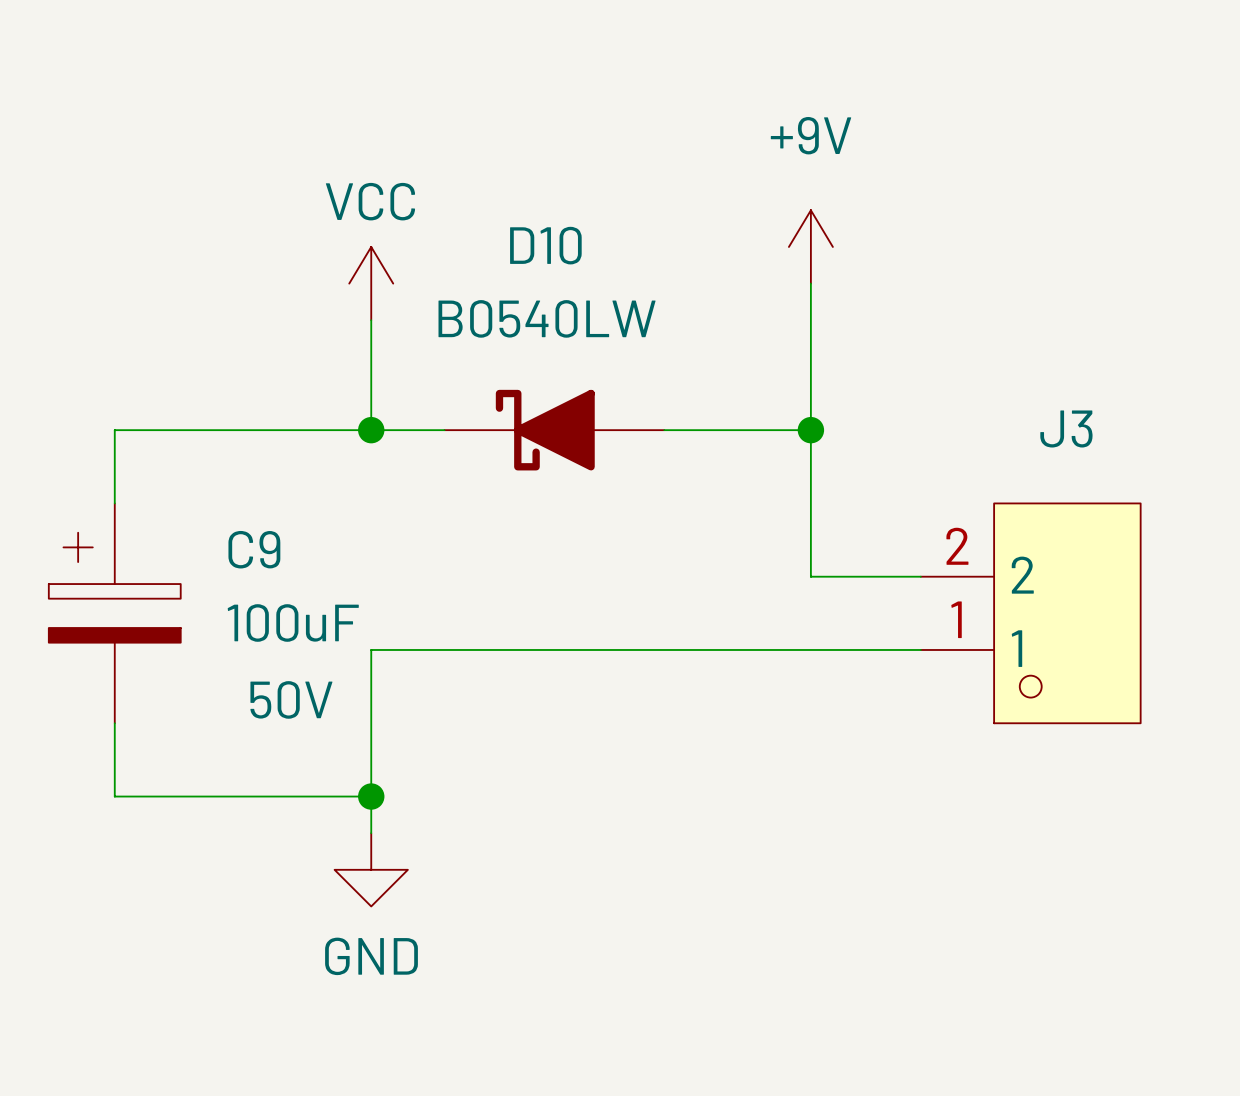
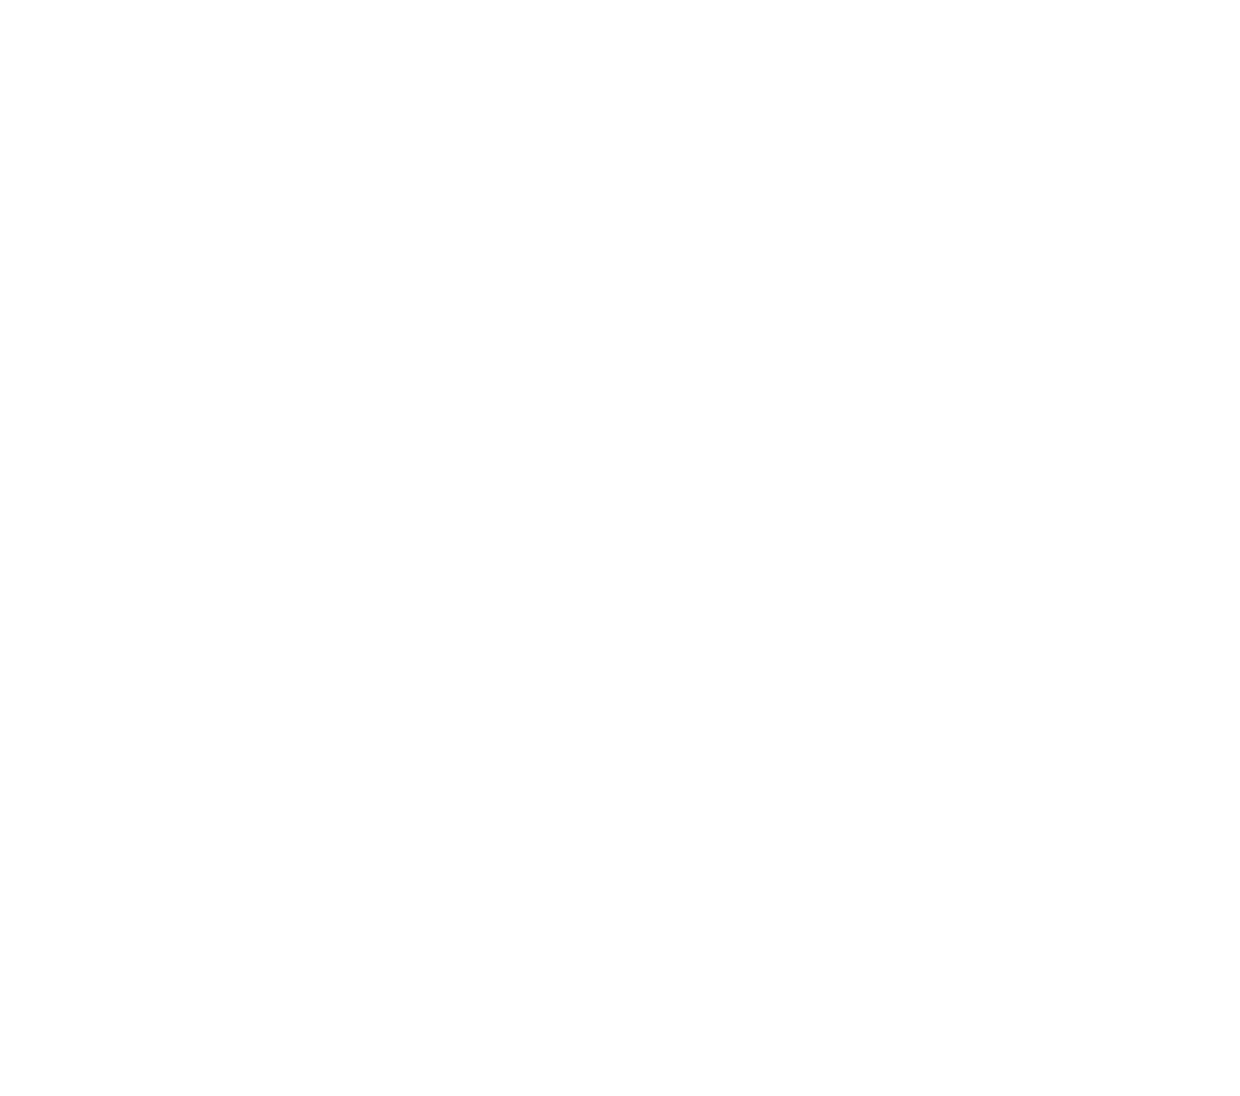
power symbol: +9V (810, 246) -> none
power symbol: VCC (371, 283) -> none
wire: (810, 283) (810, 576) (920, 576) -> none
wire: (371, 320) (371, 430) -> none
junction: (371, 430) -> none
wire: (444, 430) (114, 430) (114, 503) -> none
D10: B0540LW (554, 430) -> none
wire: (664, 430) (810, 430) -> none
junction: (810, 430) -> none
C9: 100uF (114, 613) -> none
J3: (1030, 613) -> none
wire: (920, 649) (371, 649) (371, 833) -> none
wire: (114, 723) (114, 796) (371, 796) -> none
junction: (371, 796) -> none
power symbol: GND (371, 869) -> none

